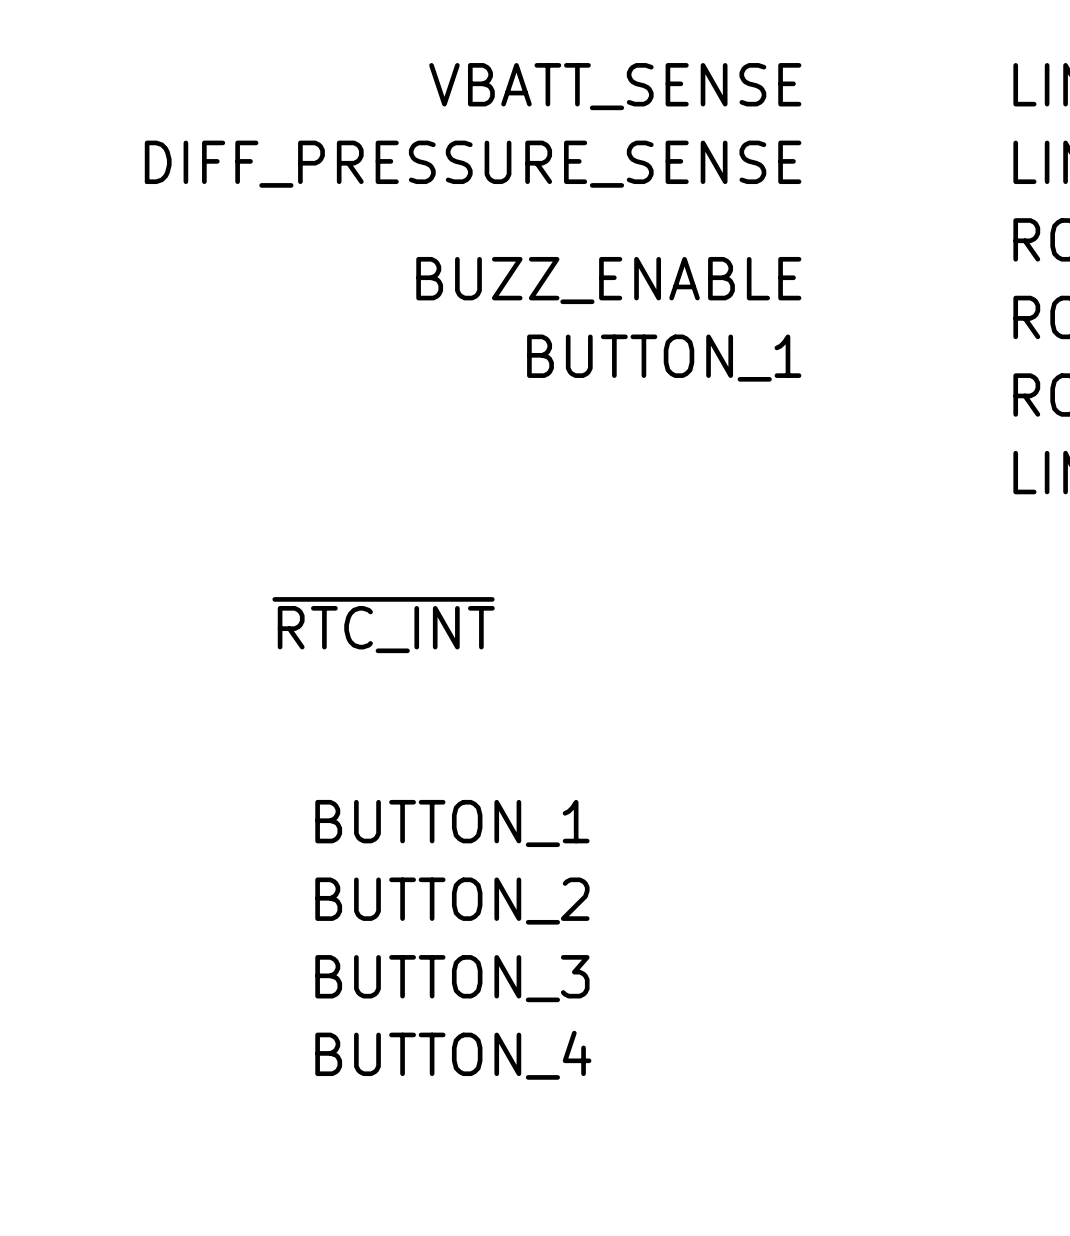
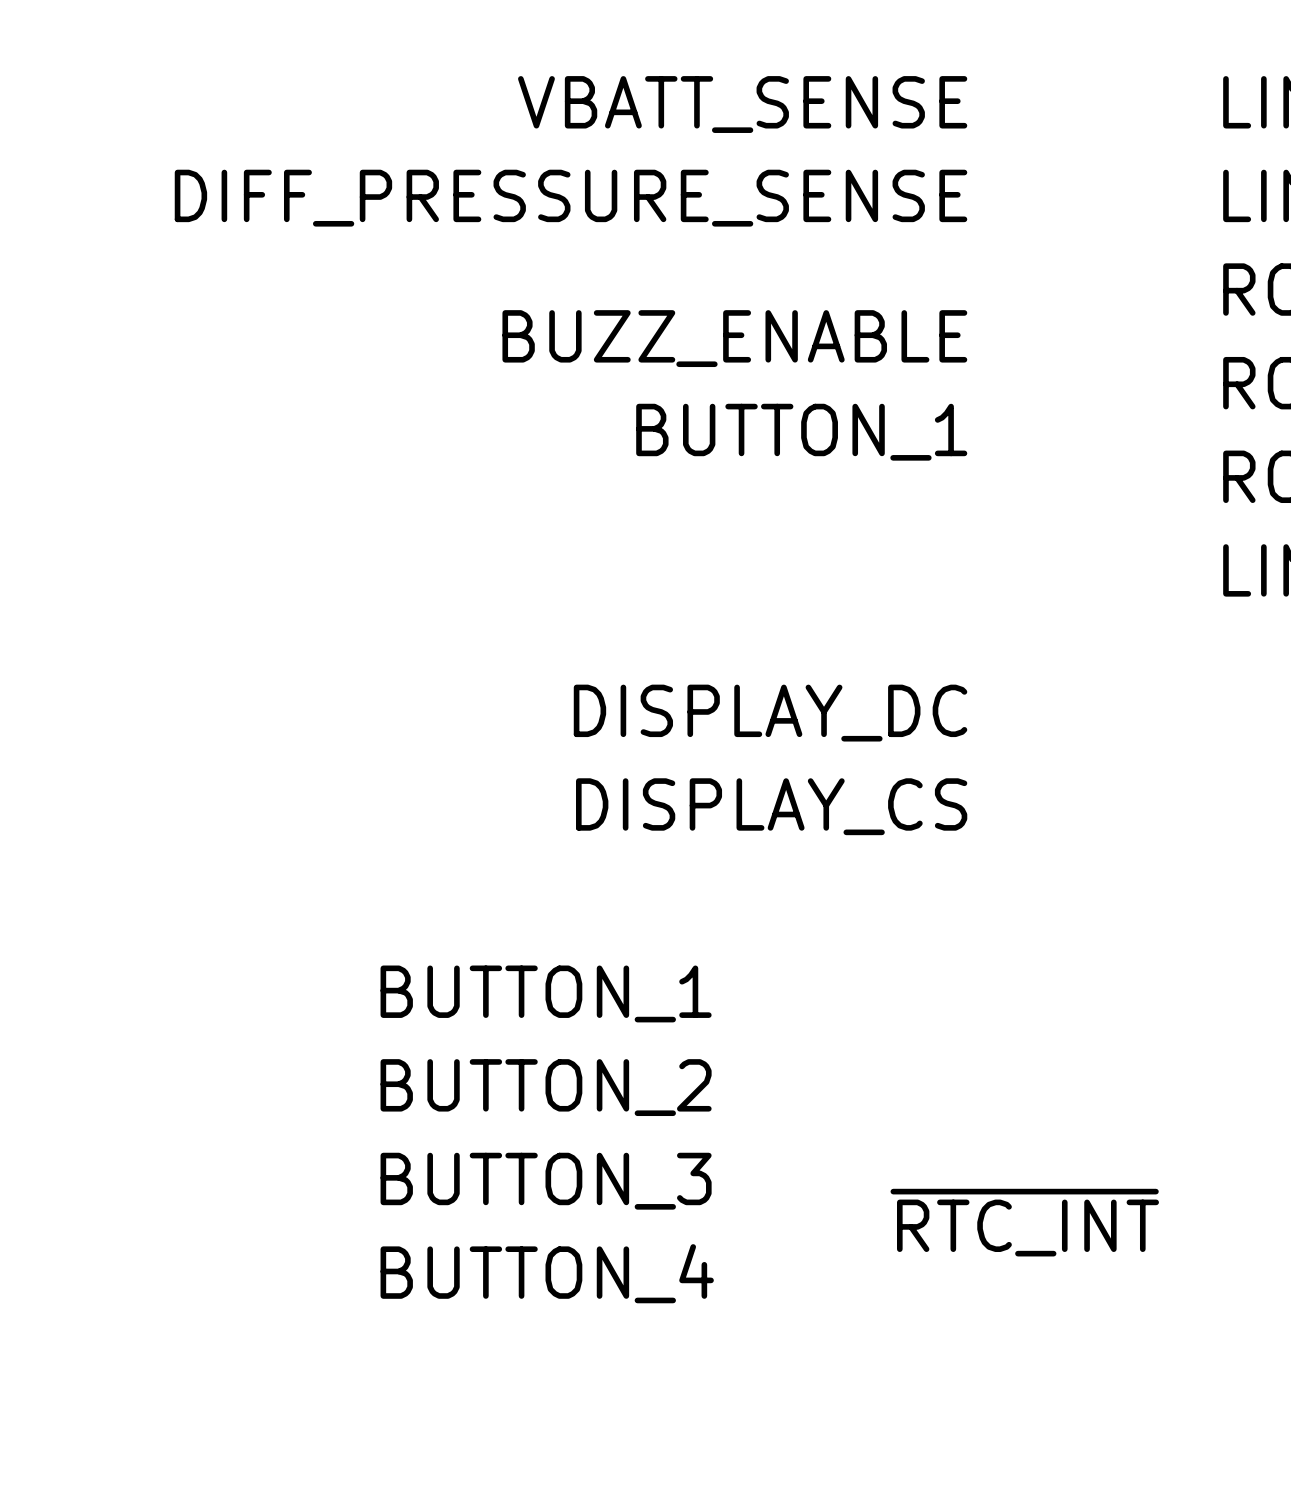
label: none -> DISPLAY_DC (770, 713)
label position: ~{RTC_INT} (383, 625) -> ~{RTC_INT} (1024, 1222)
label: none -> DISPLAY_CS (771, 806)

